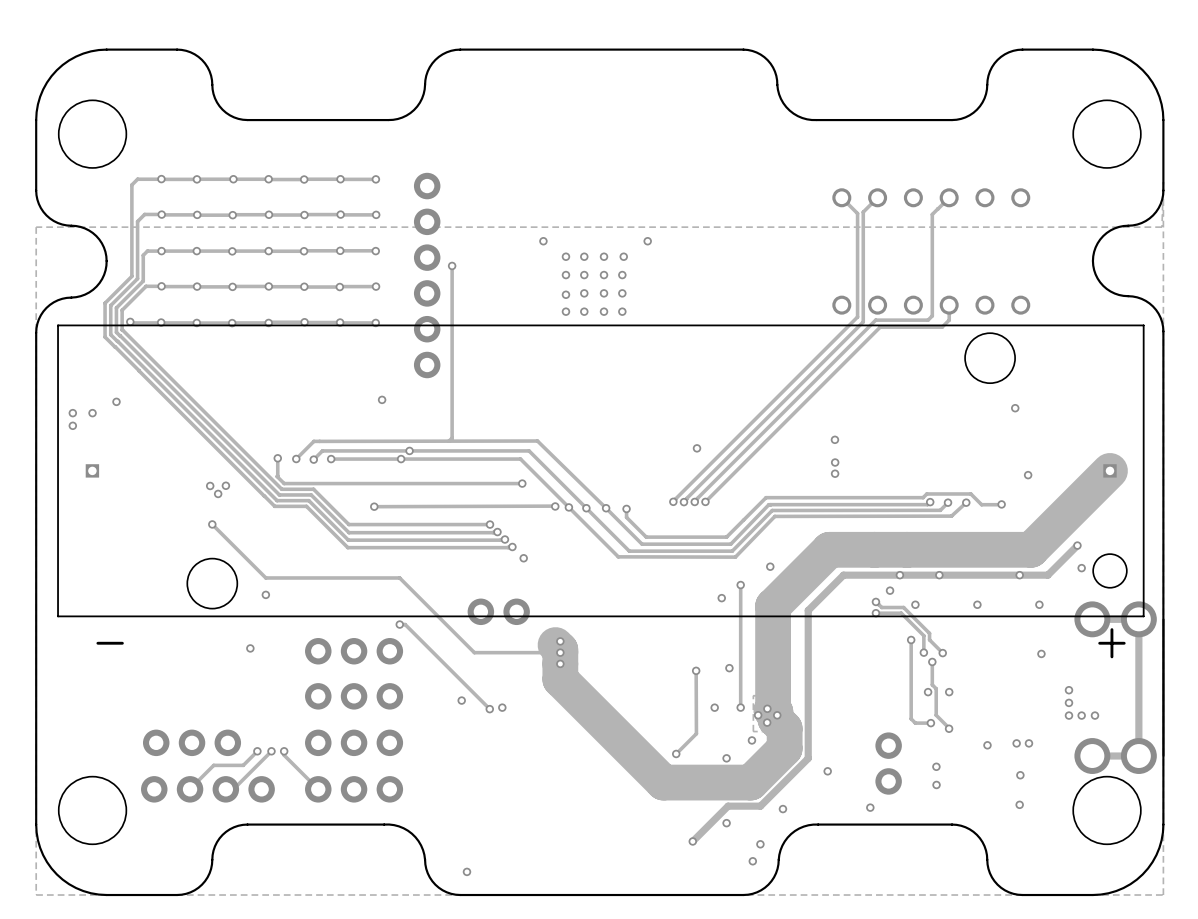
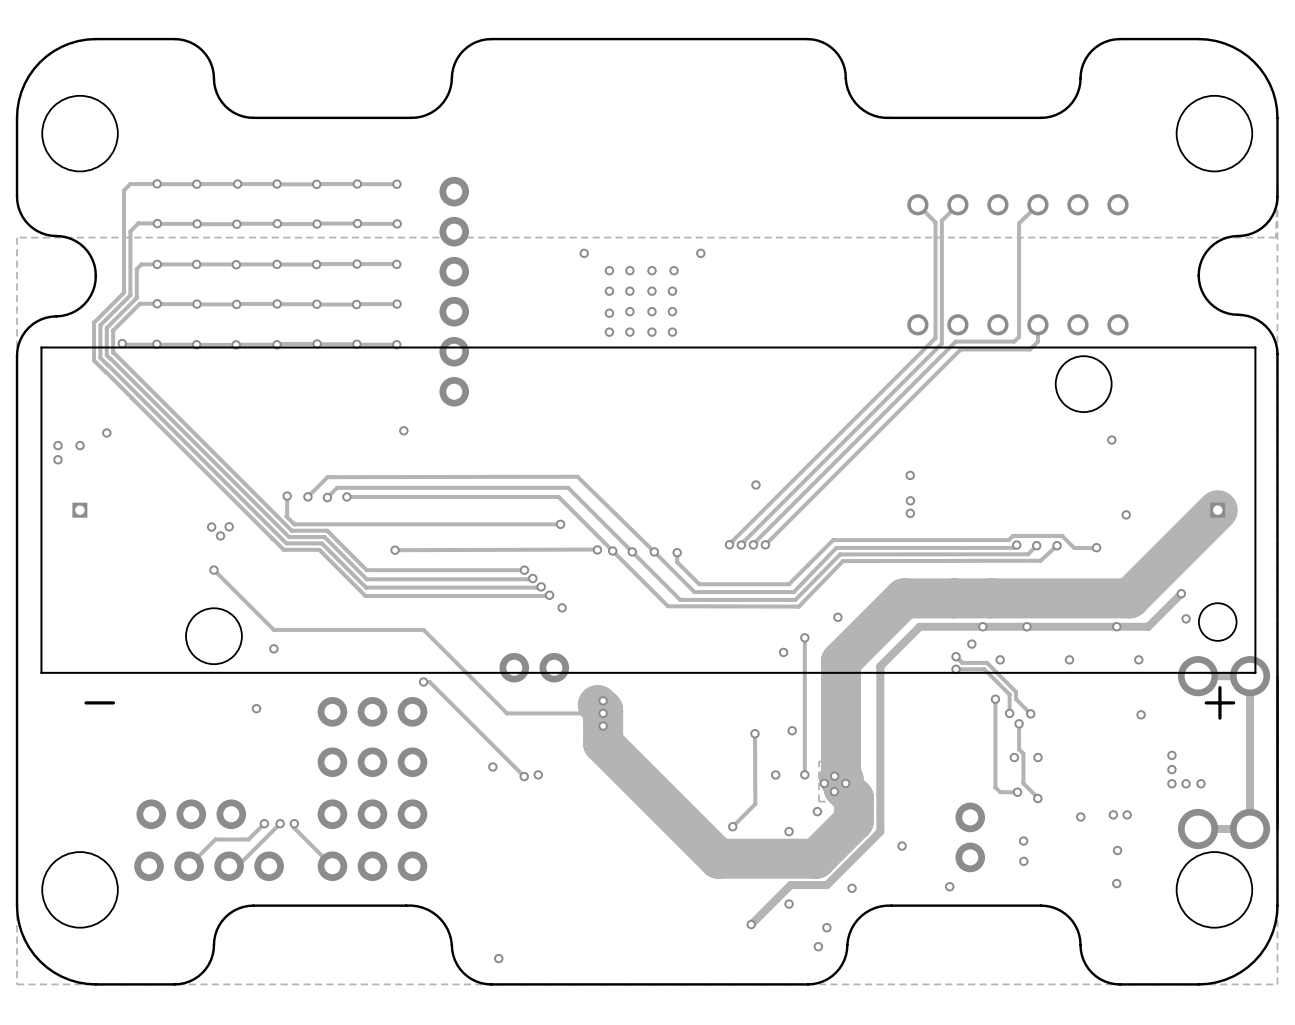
track: (452, 265) (452, 438) (449, 441) -> none
via: (452, 265) -> none
via: (409, 450) -> none
via: (401, 459) -> none

